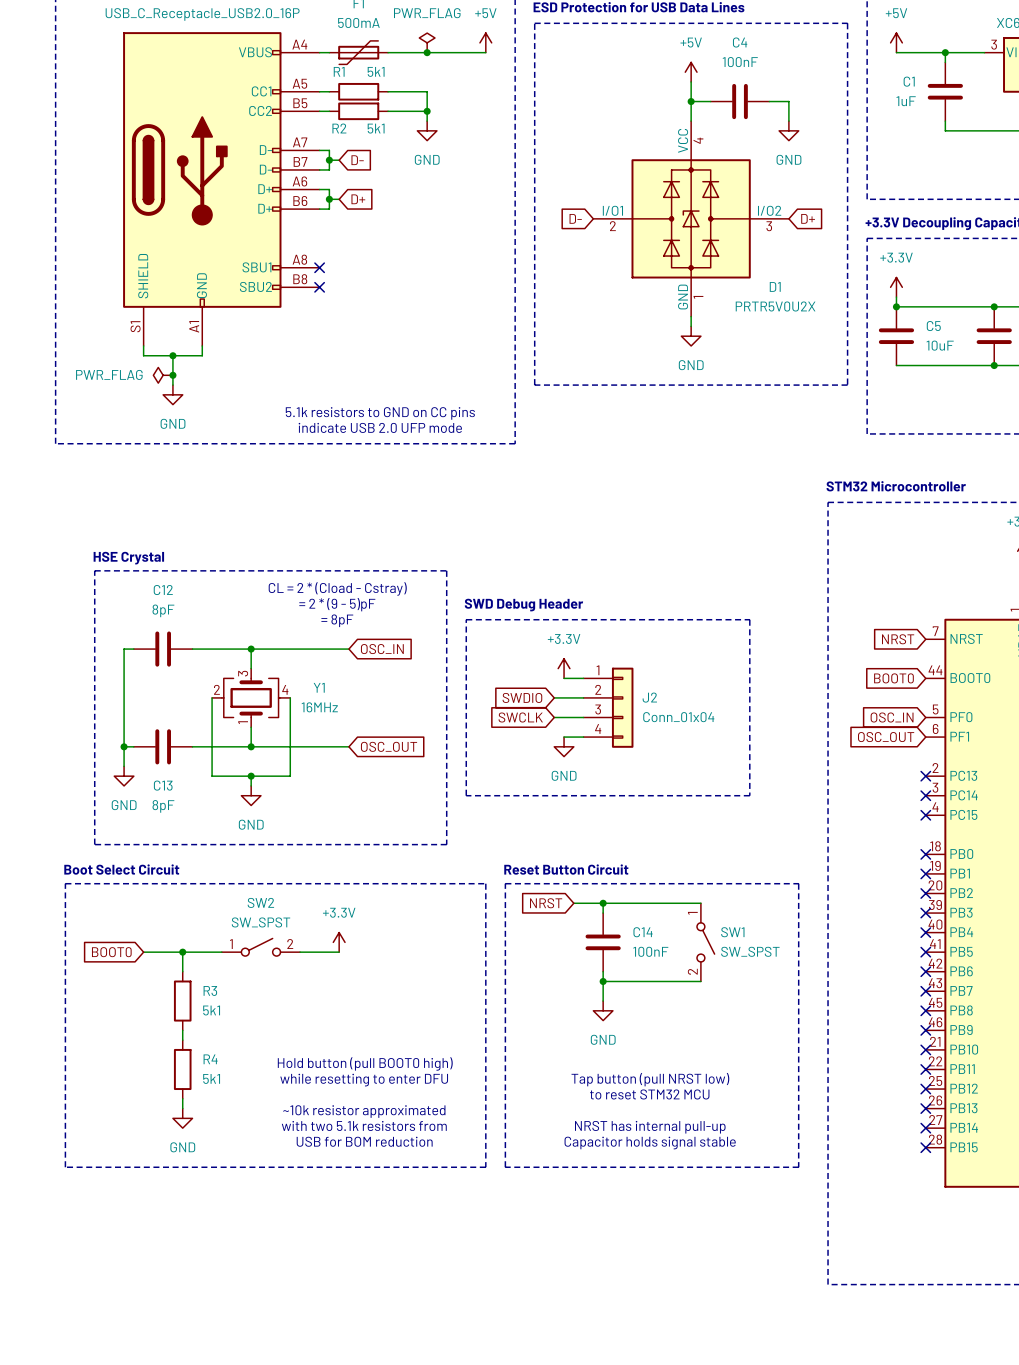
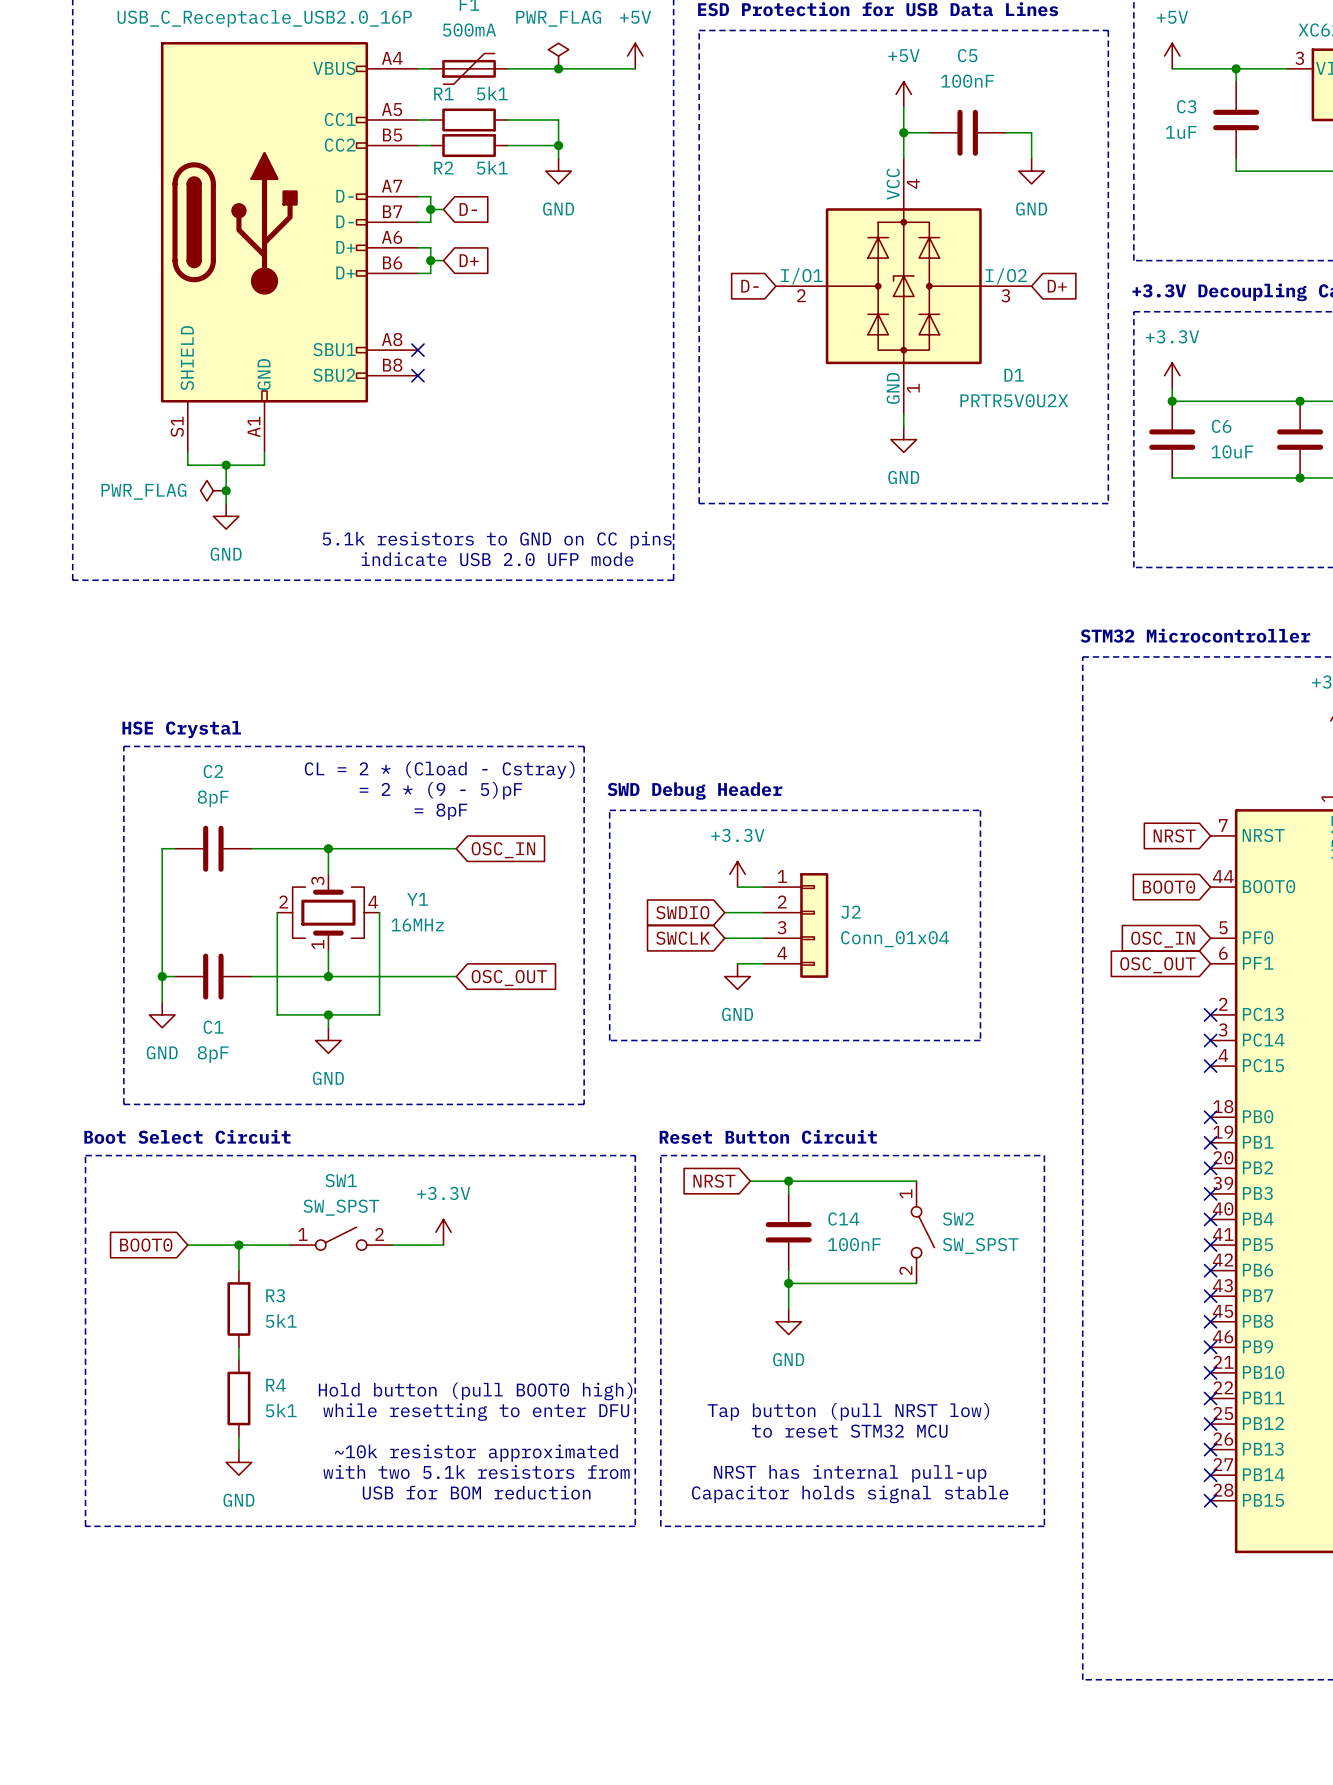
C4 name: C4 (740, 42) -> C5 (967, 55)
C1 name: C1 (909, 81) -> C3 (1186, 106)
C5 name: C5 (933, 326) -> C6 (1221, 426)
C12 name: C12 (163, 590) -> C2 (213, 771)
C13 name: C13 (163, 785) -> C1 (213, 1027)
SW2 name: SW2 (260, 902) -> SW1 (341, 1180)
SW1 name: SW1 (732, 932) -> SW2 (958, 1219)

